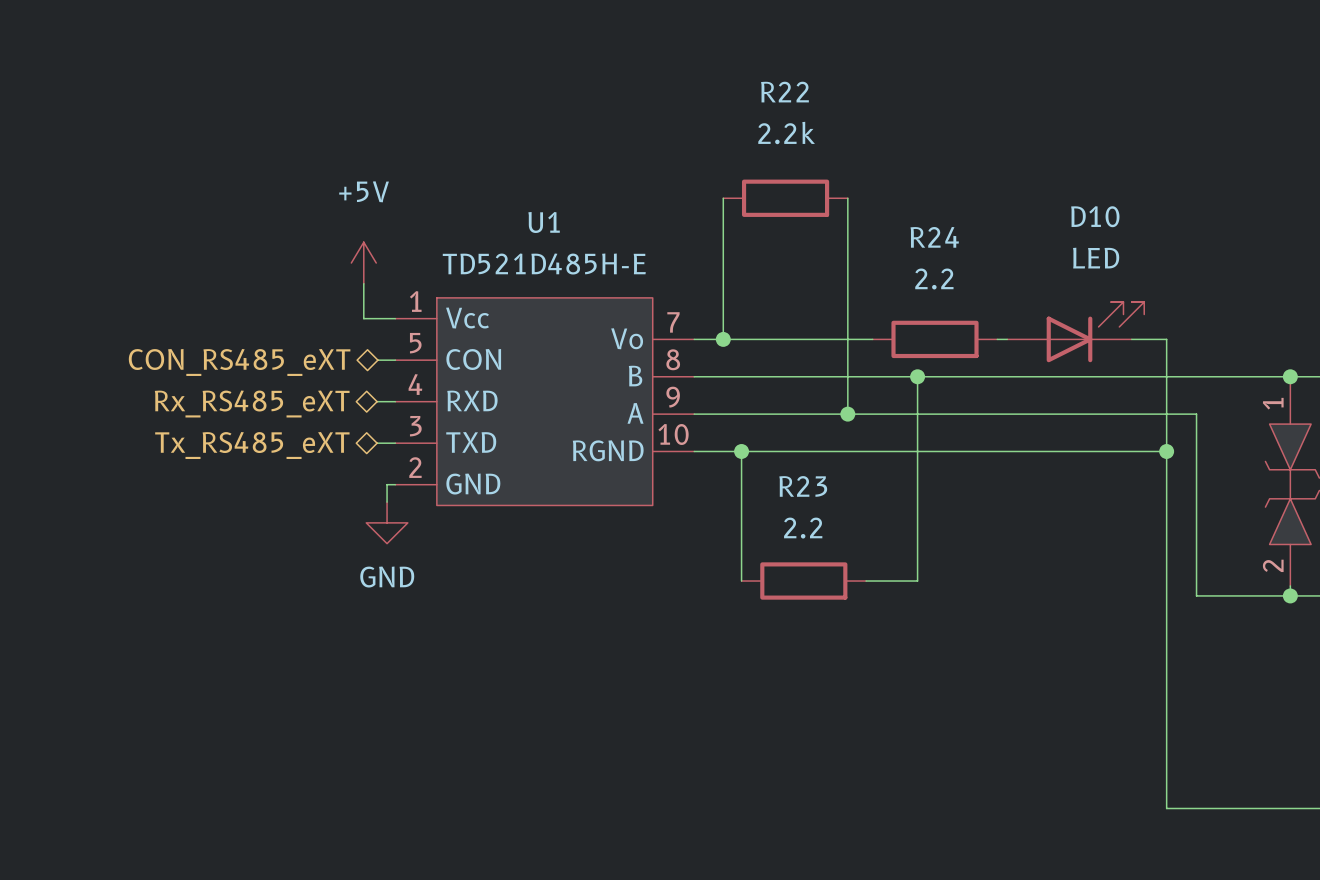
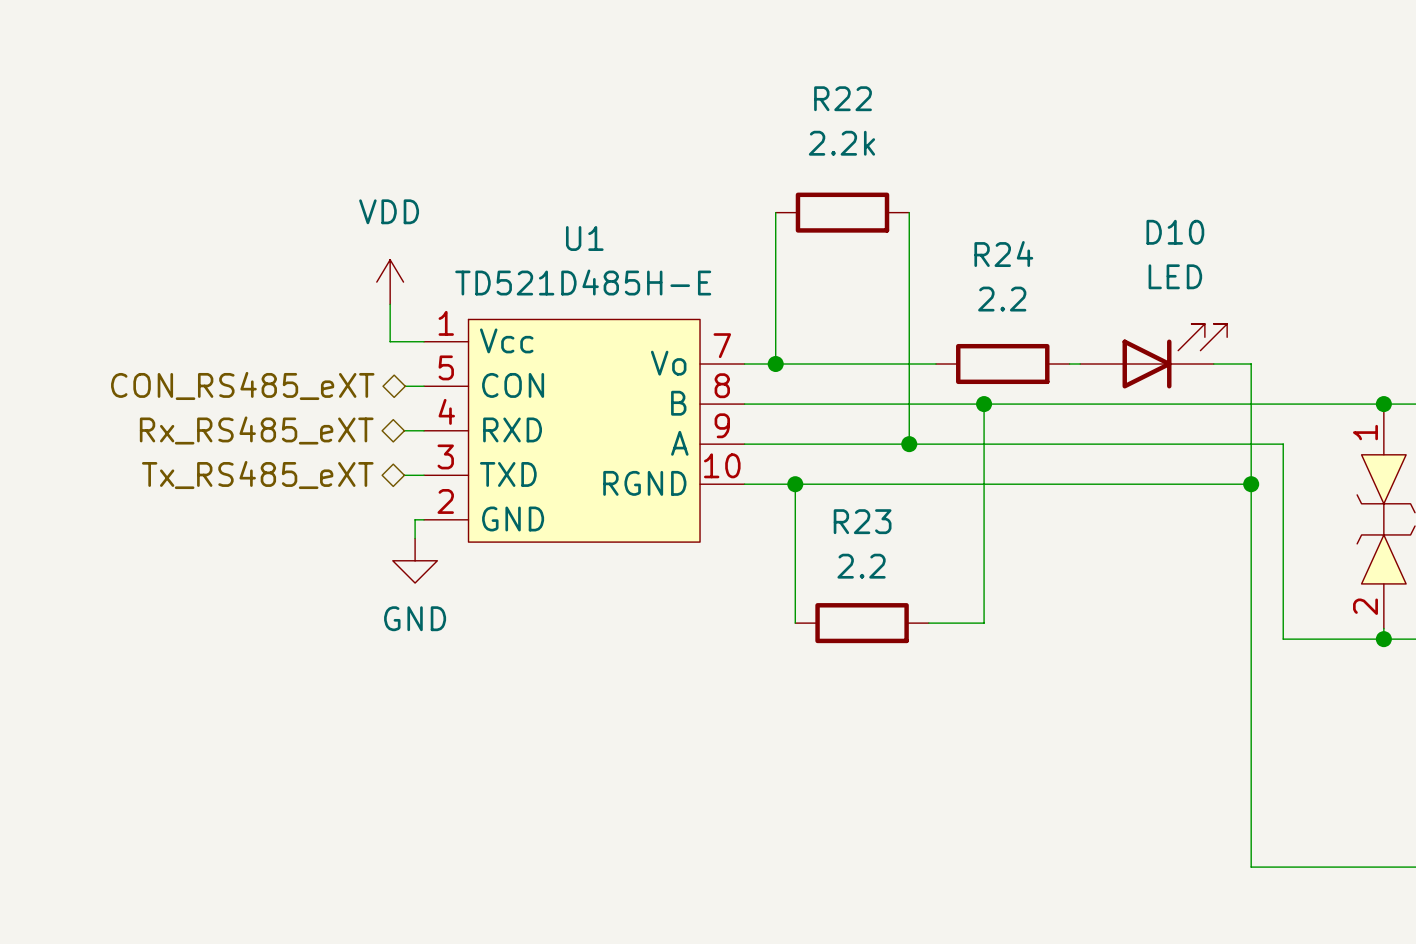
power symbol: +5V (363, 263) -> VDD (390, 282)

